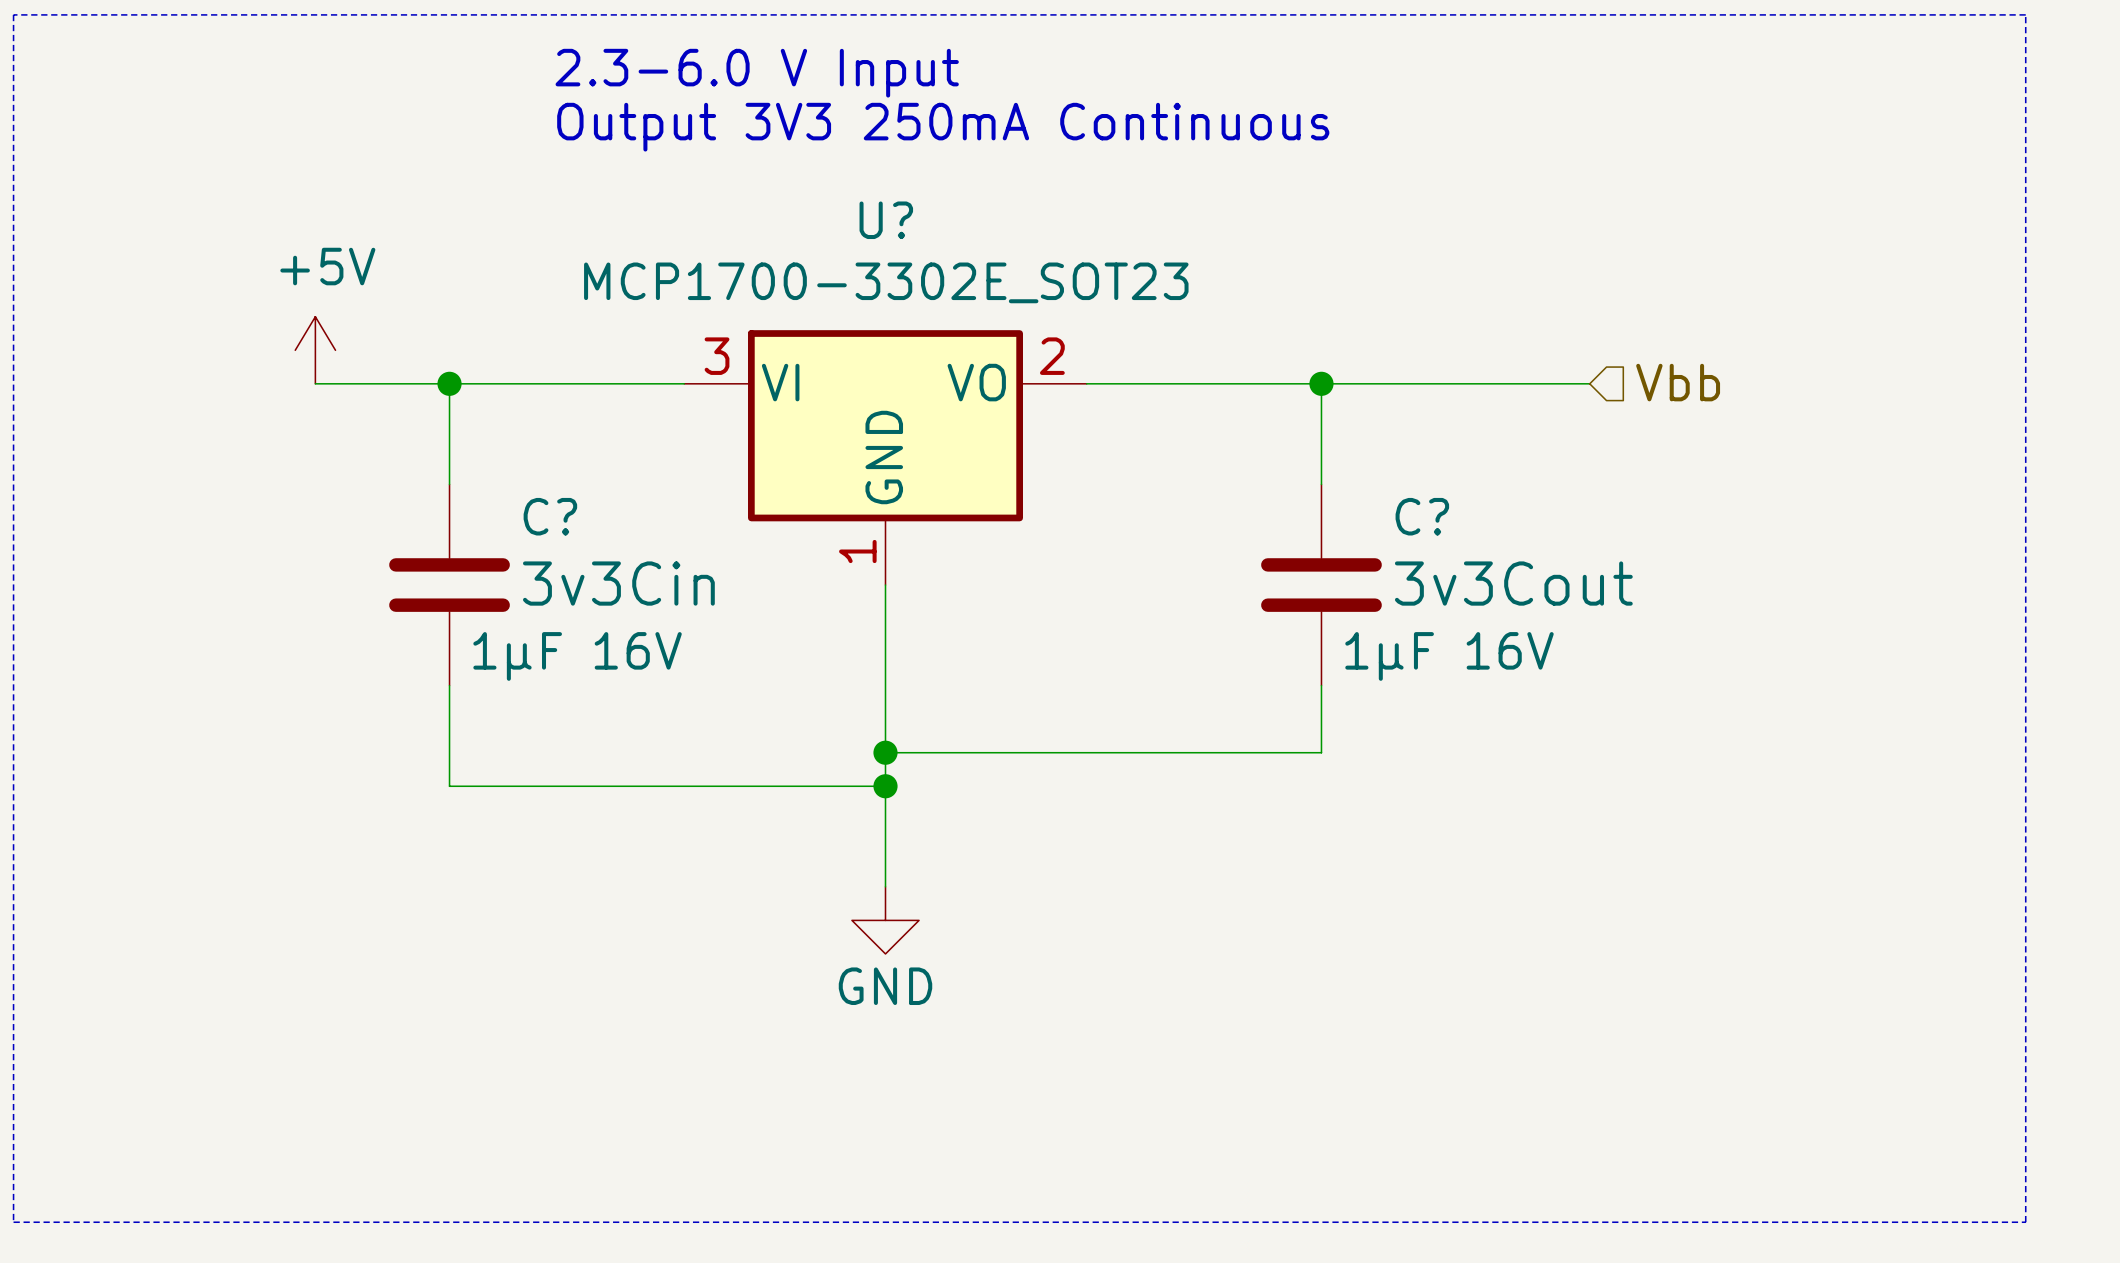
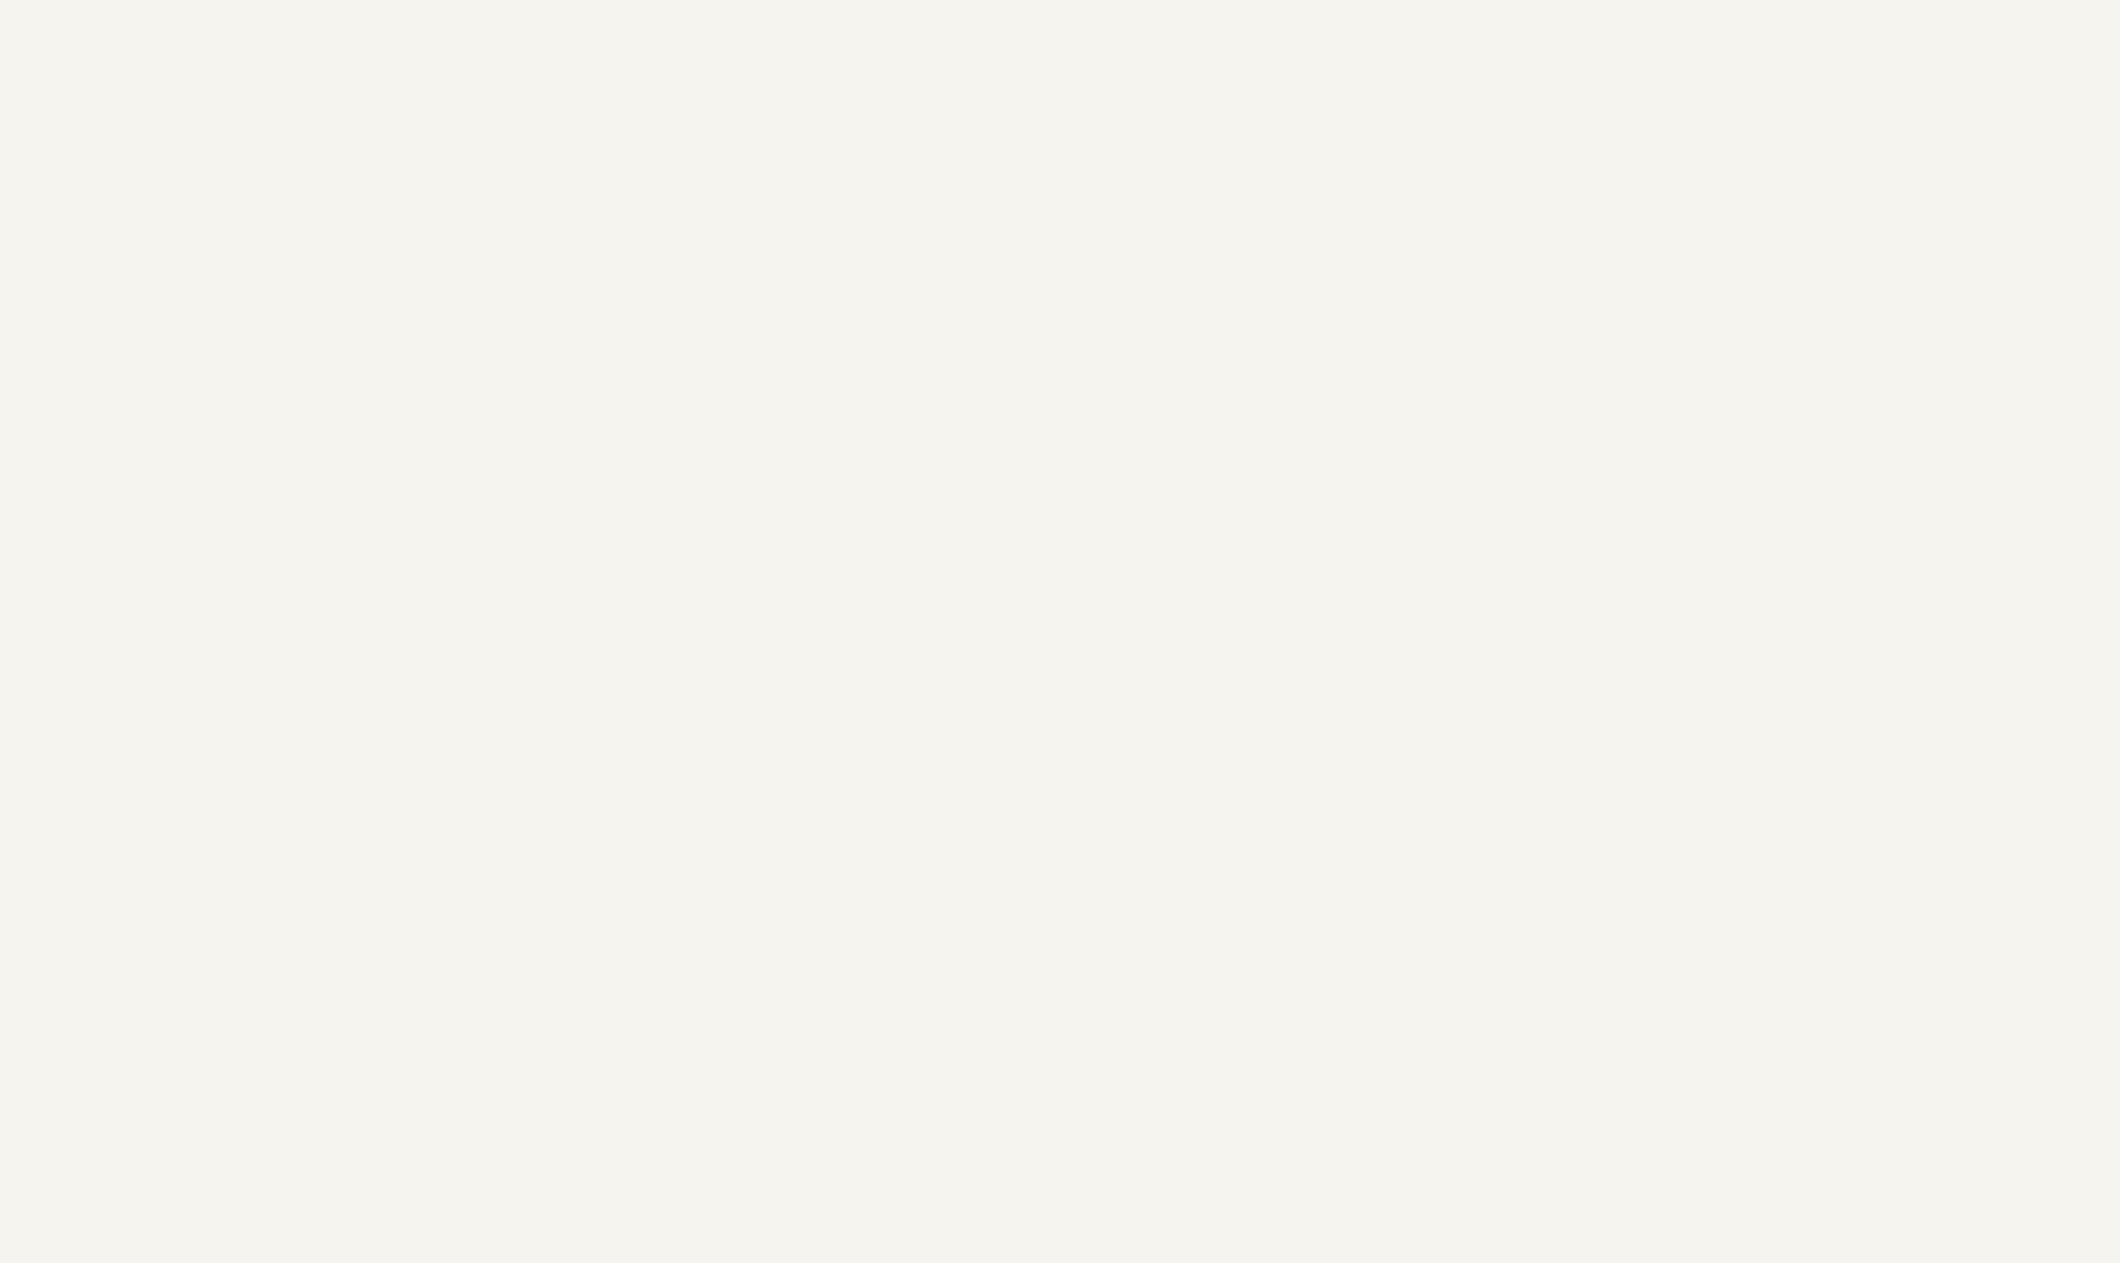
line: (13, 14) (13, 1222) (2025, 1222) (2025, 14) (13, 14) -> none
text: 2.3-6.0 V Input (757, 73) -> none
text: Output 3V3 250mA Continuous (943, 127) -> none
power symbol: +5V (315, 350) -> none
hierarchical label: Vbb (1678, 382) -> none
wire: (315, 383) (684, 383) -> none
wire: (449, 383) (449, 484) -> none
junction: (449, 383) -> none
wire: (1086, 383) (1589, 383) -> none
wire: (1321, 383) (1321, 484) -> none
junction: (1321, 383) -> none
U?: MCP1700-3302E_SOT23 (885, 457) -> none
C?: 1μF 16V (449, 585) -> none
wire: (885, 585) (885, 886) -> none
C?: 1μF 16V (1321, 585) -> none
wire: (449, 685) (449, 786) (885, 786) -> none
wire: (1321, 685) (1321, 752) (885, 752) -> none
junction: (885, 752) -> none
junction: (885, 786) -> none
power symbol: GND (885, 920) -> none

